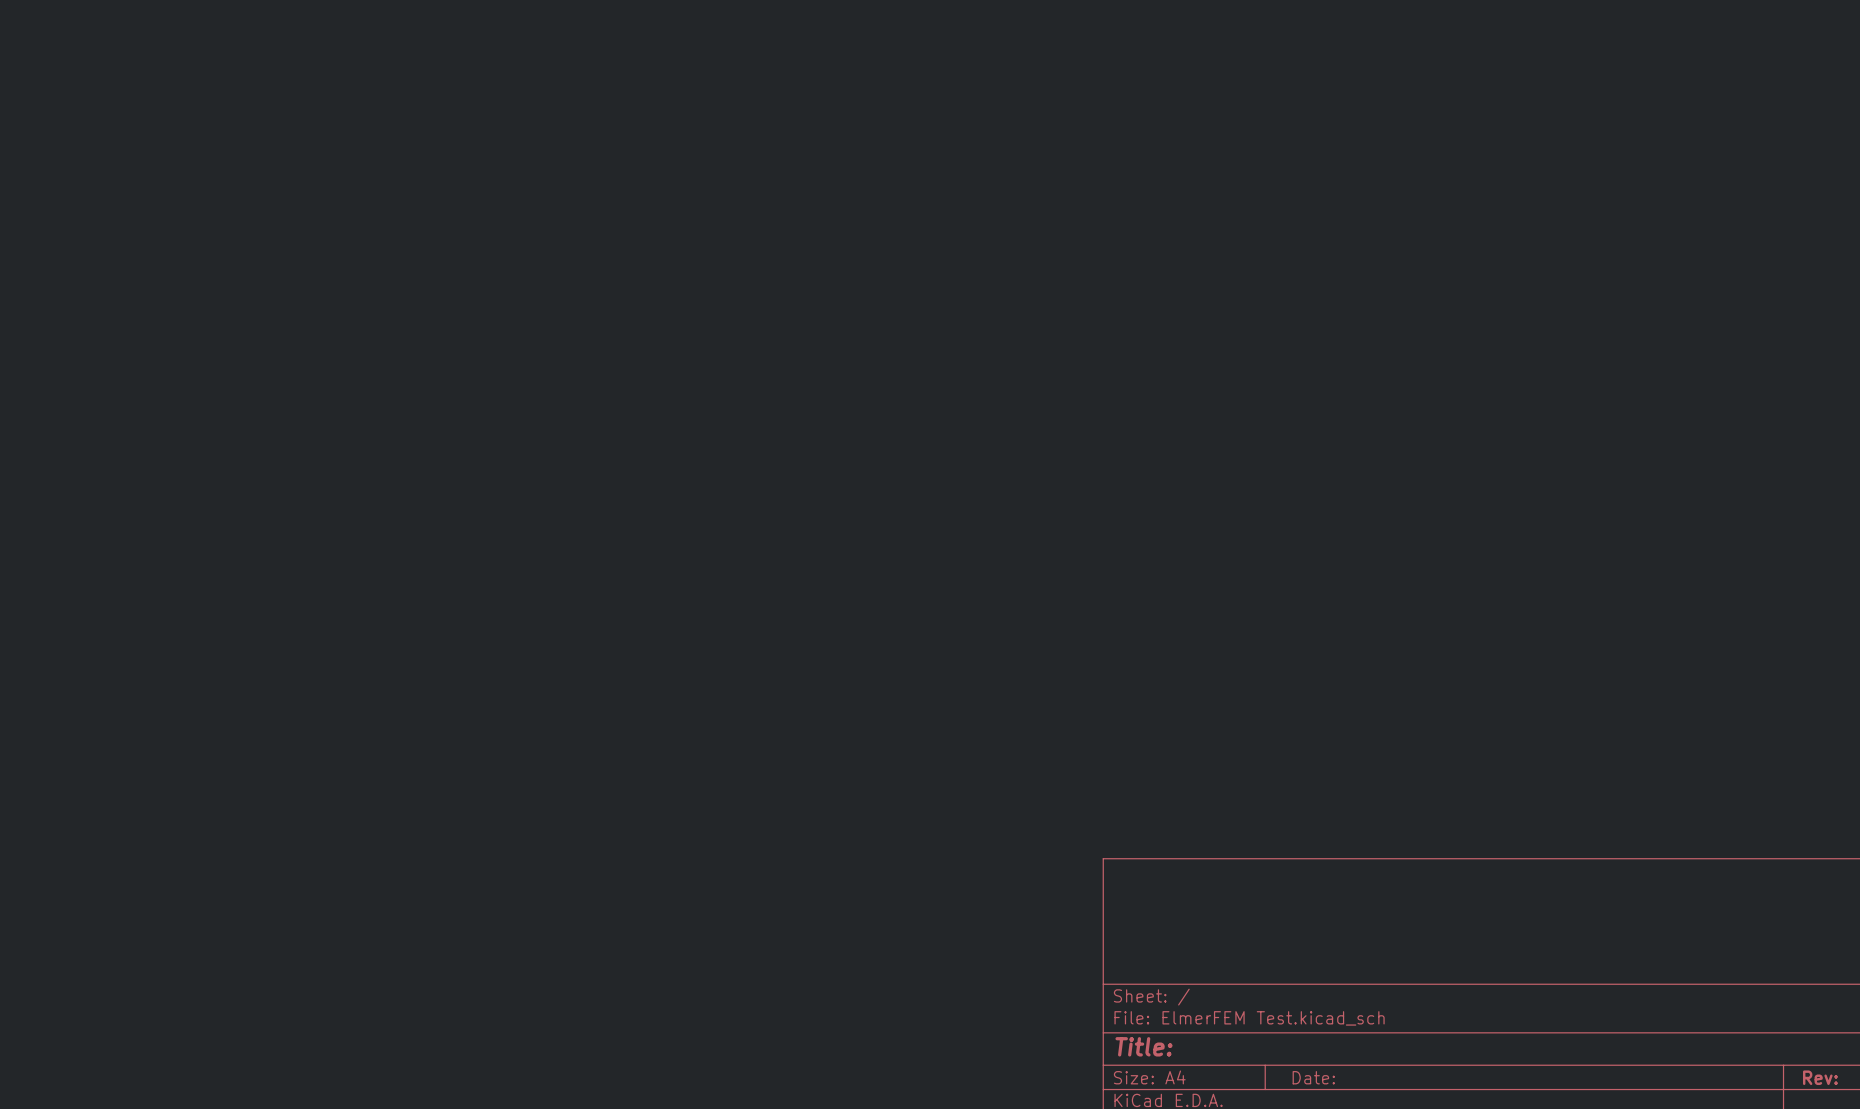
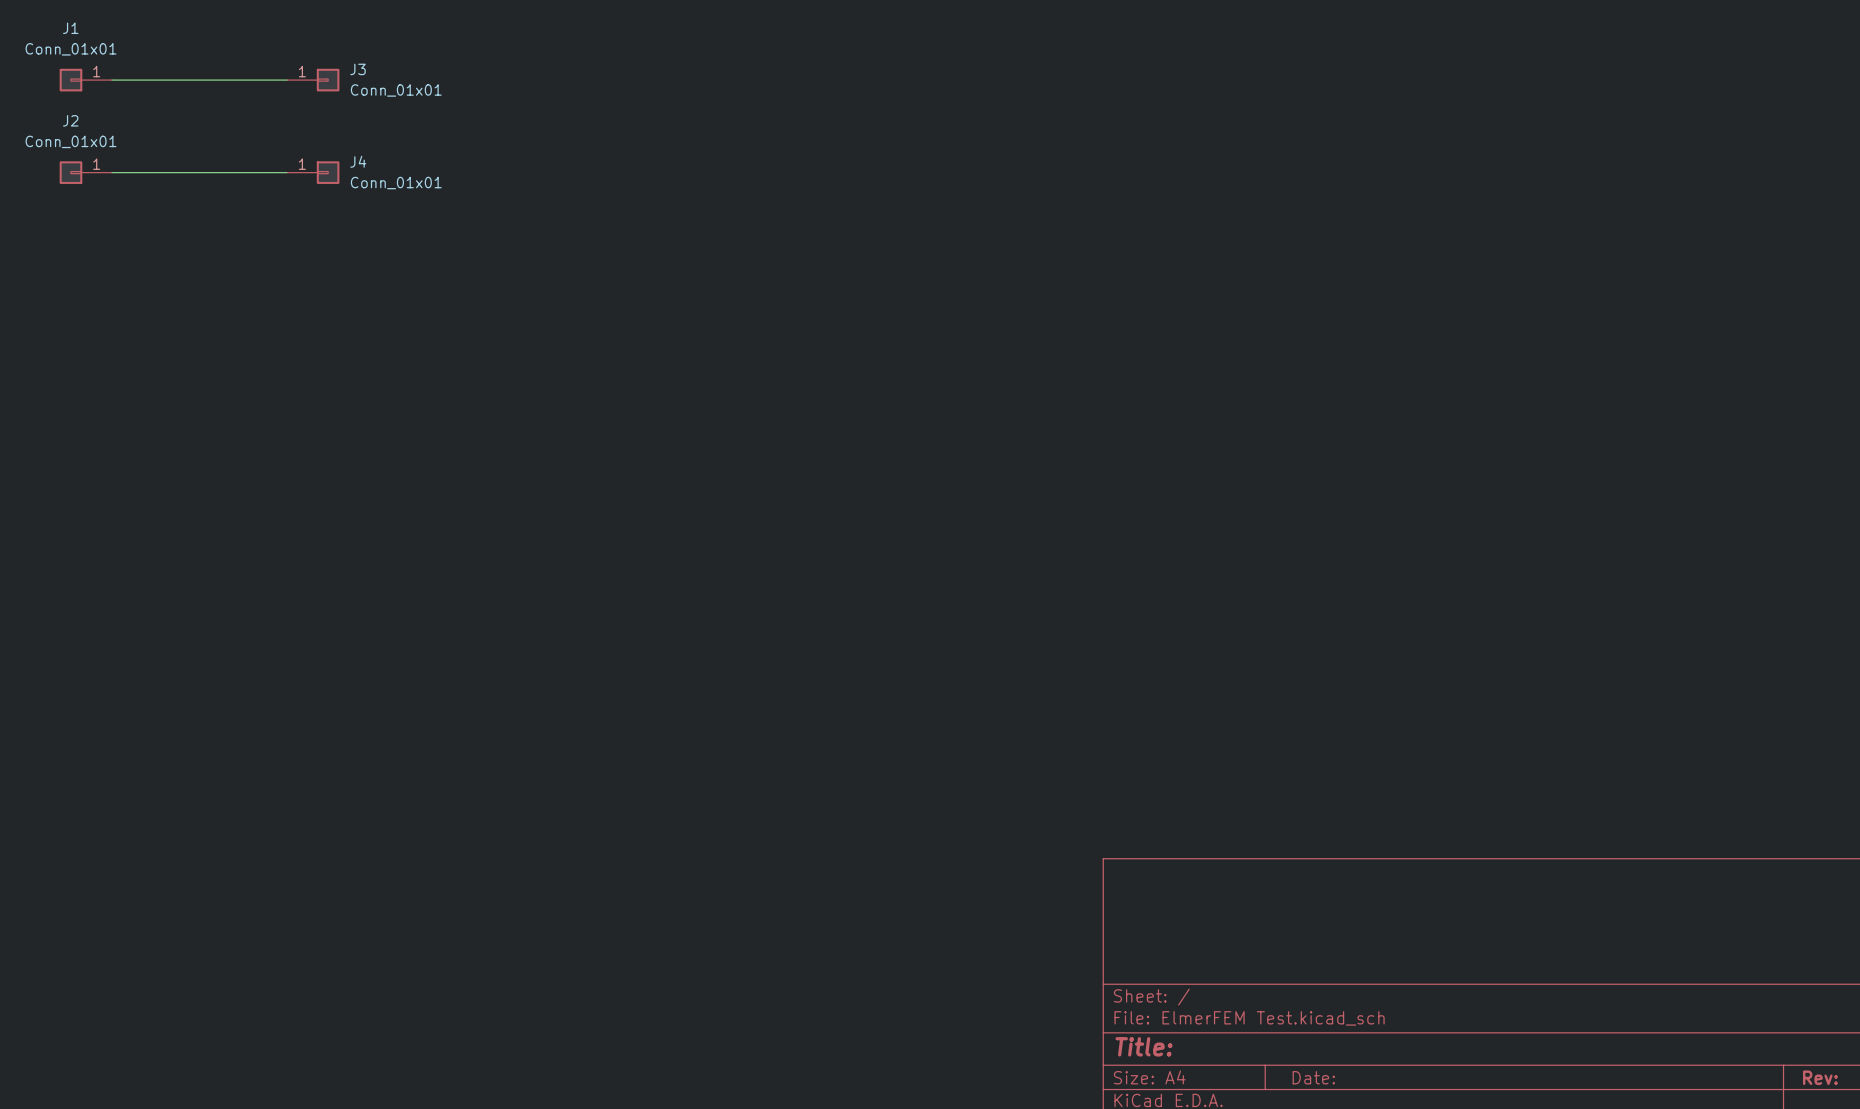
J1: none -> Conn_01x01 (85, 80)
wire: none -> (112, 80) (286, 80)
J3: none -> Conn_01x01 (313, 80)
J2: none -> Conn_01x01 (85, 172)
wire: none -> (112, 172) (286, 172)
J4: none -> Conn_01x01 (313, 172)

